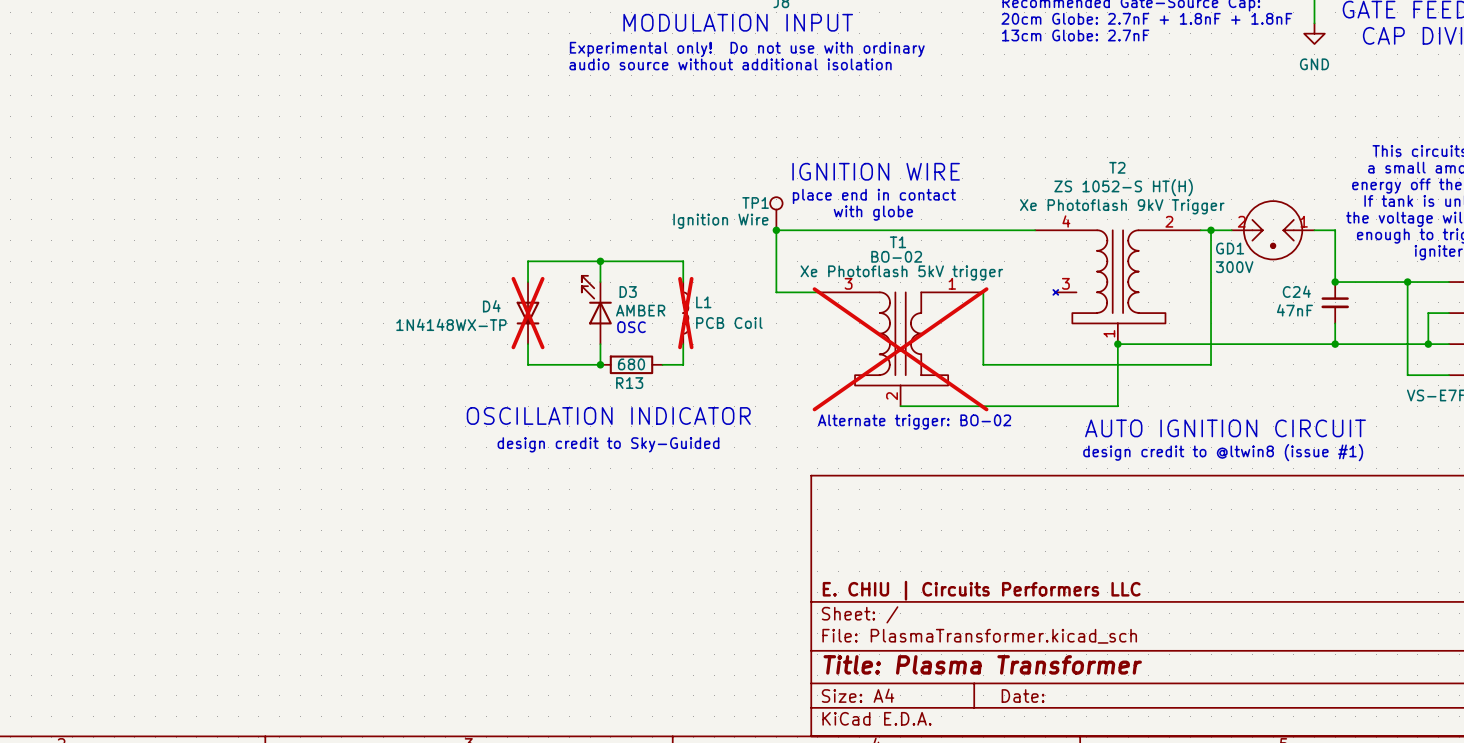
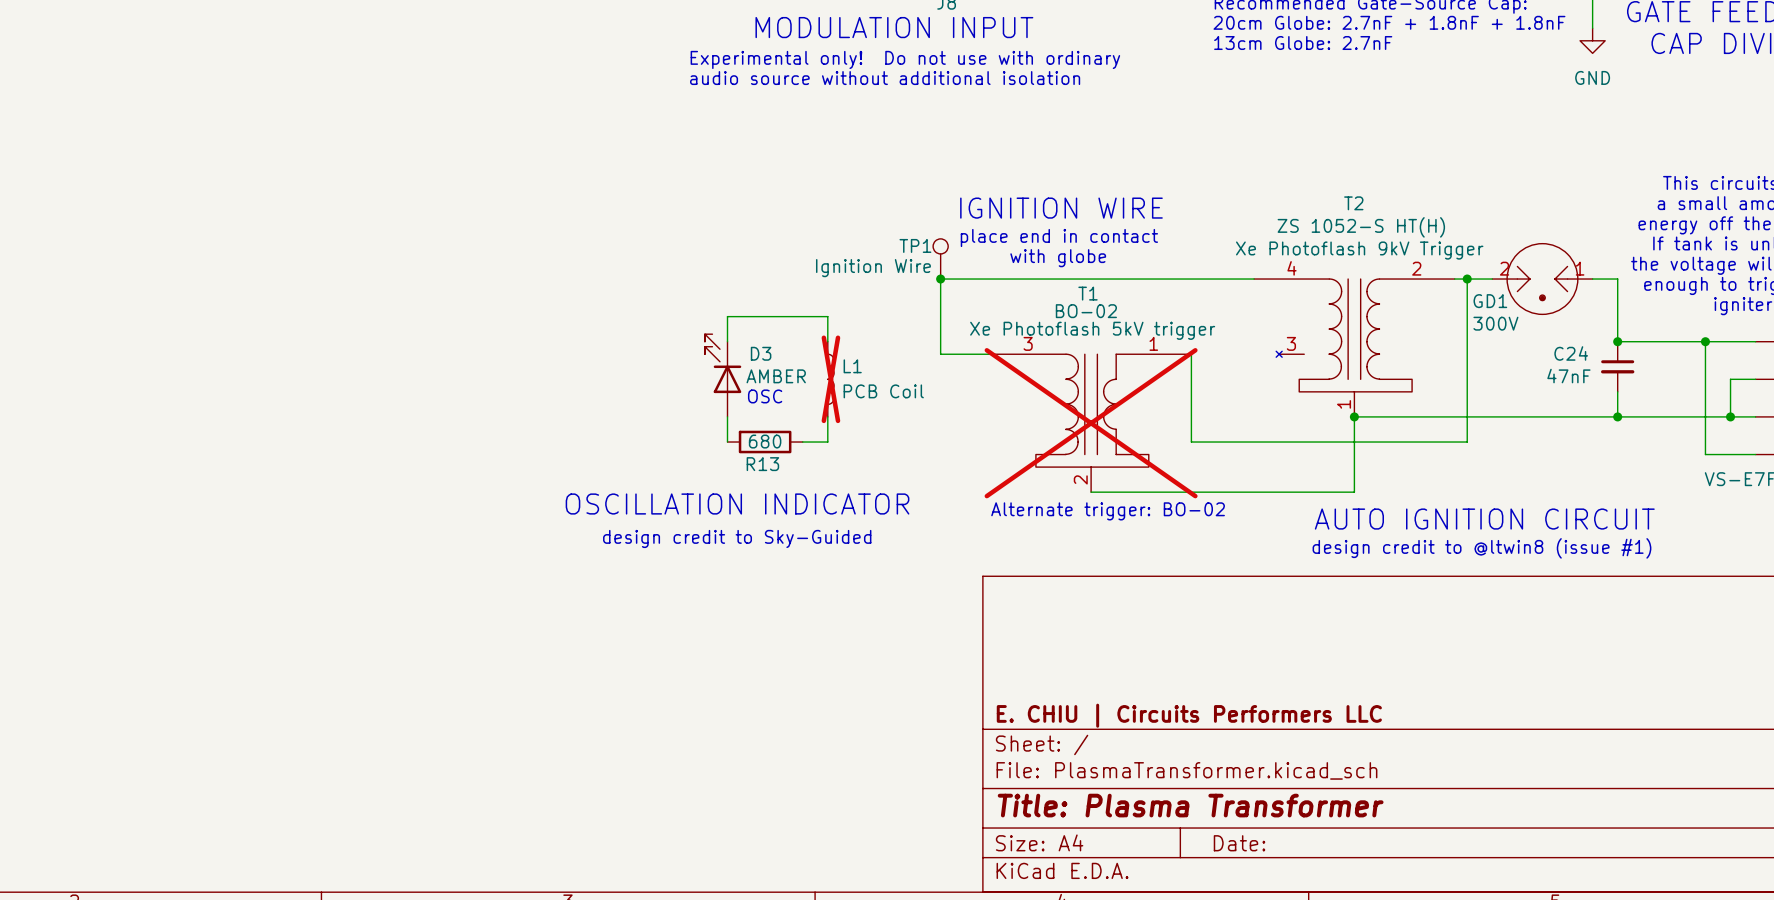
wire: (600, 261) (528, 261) (528, 282) -> none
junction: (600, 261) -> none
D4: (528, 313) -> none
wire: (528, 344) (528, 364) (600, 364) -> none
junction: (600, 364) -> none

